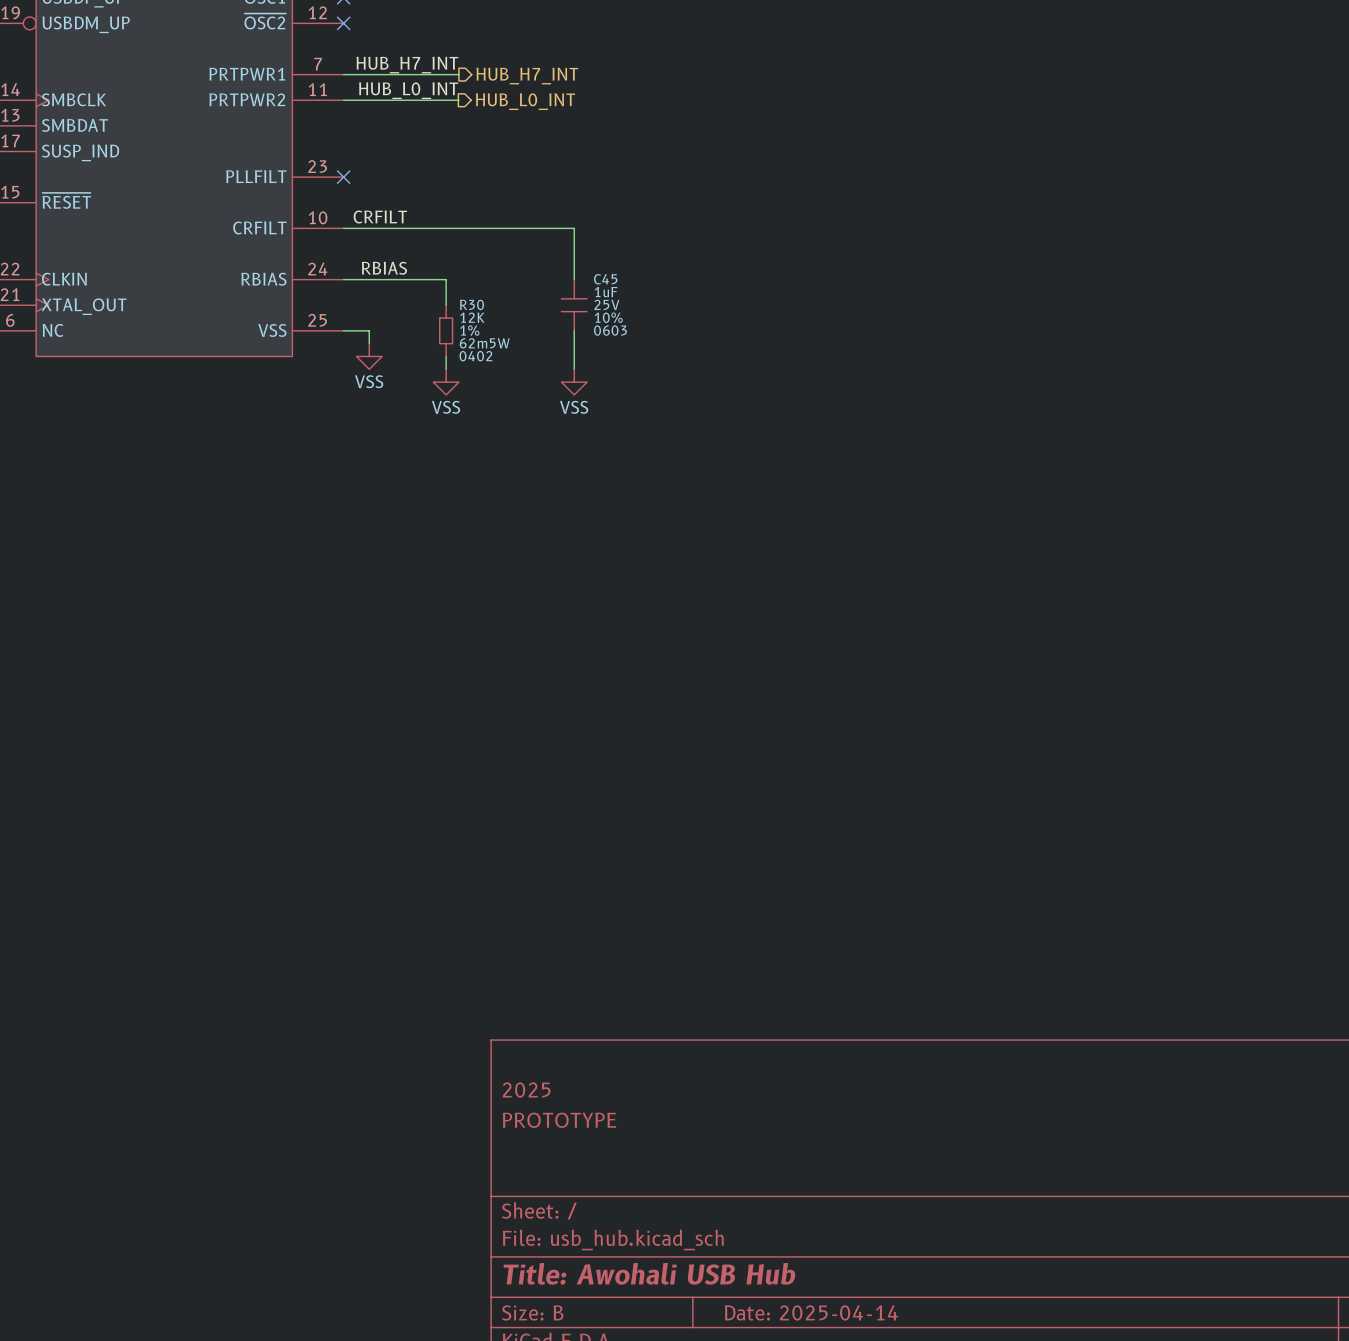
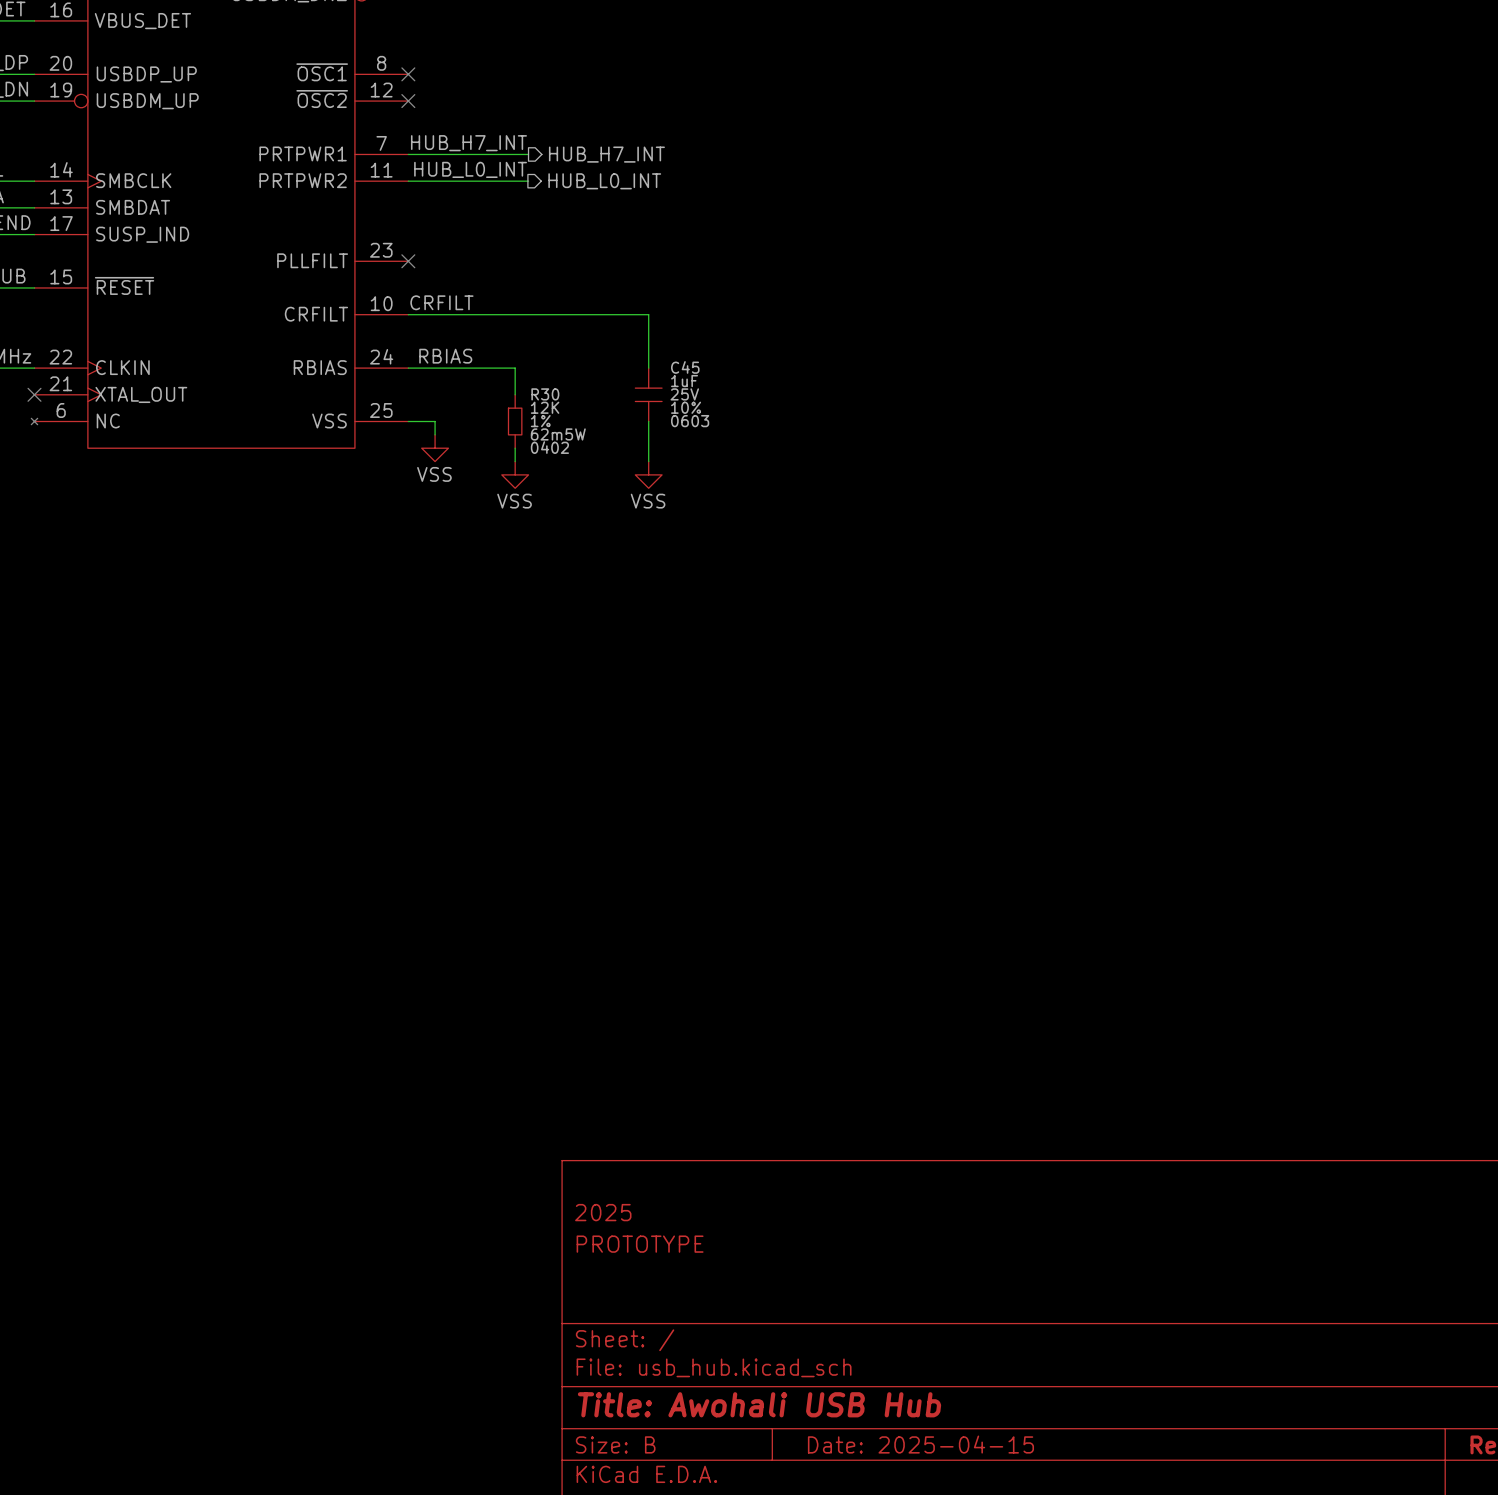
title block: Date: 2025-04-14 (811, 1312) -> Date: 2025-04-15 (920, 1444)

